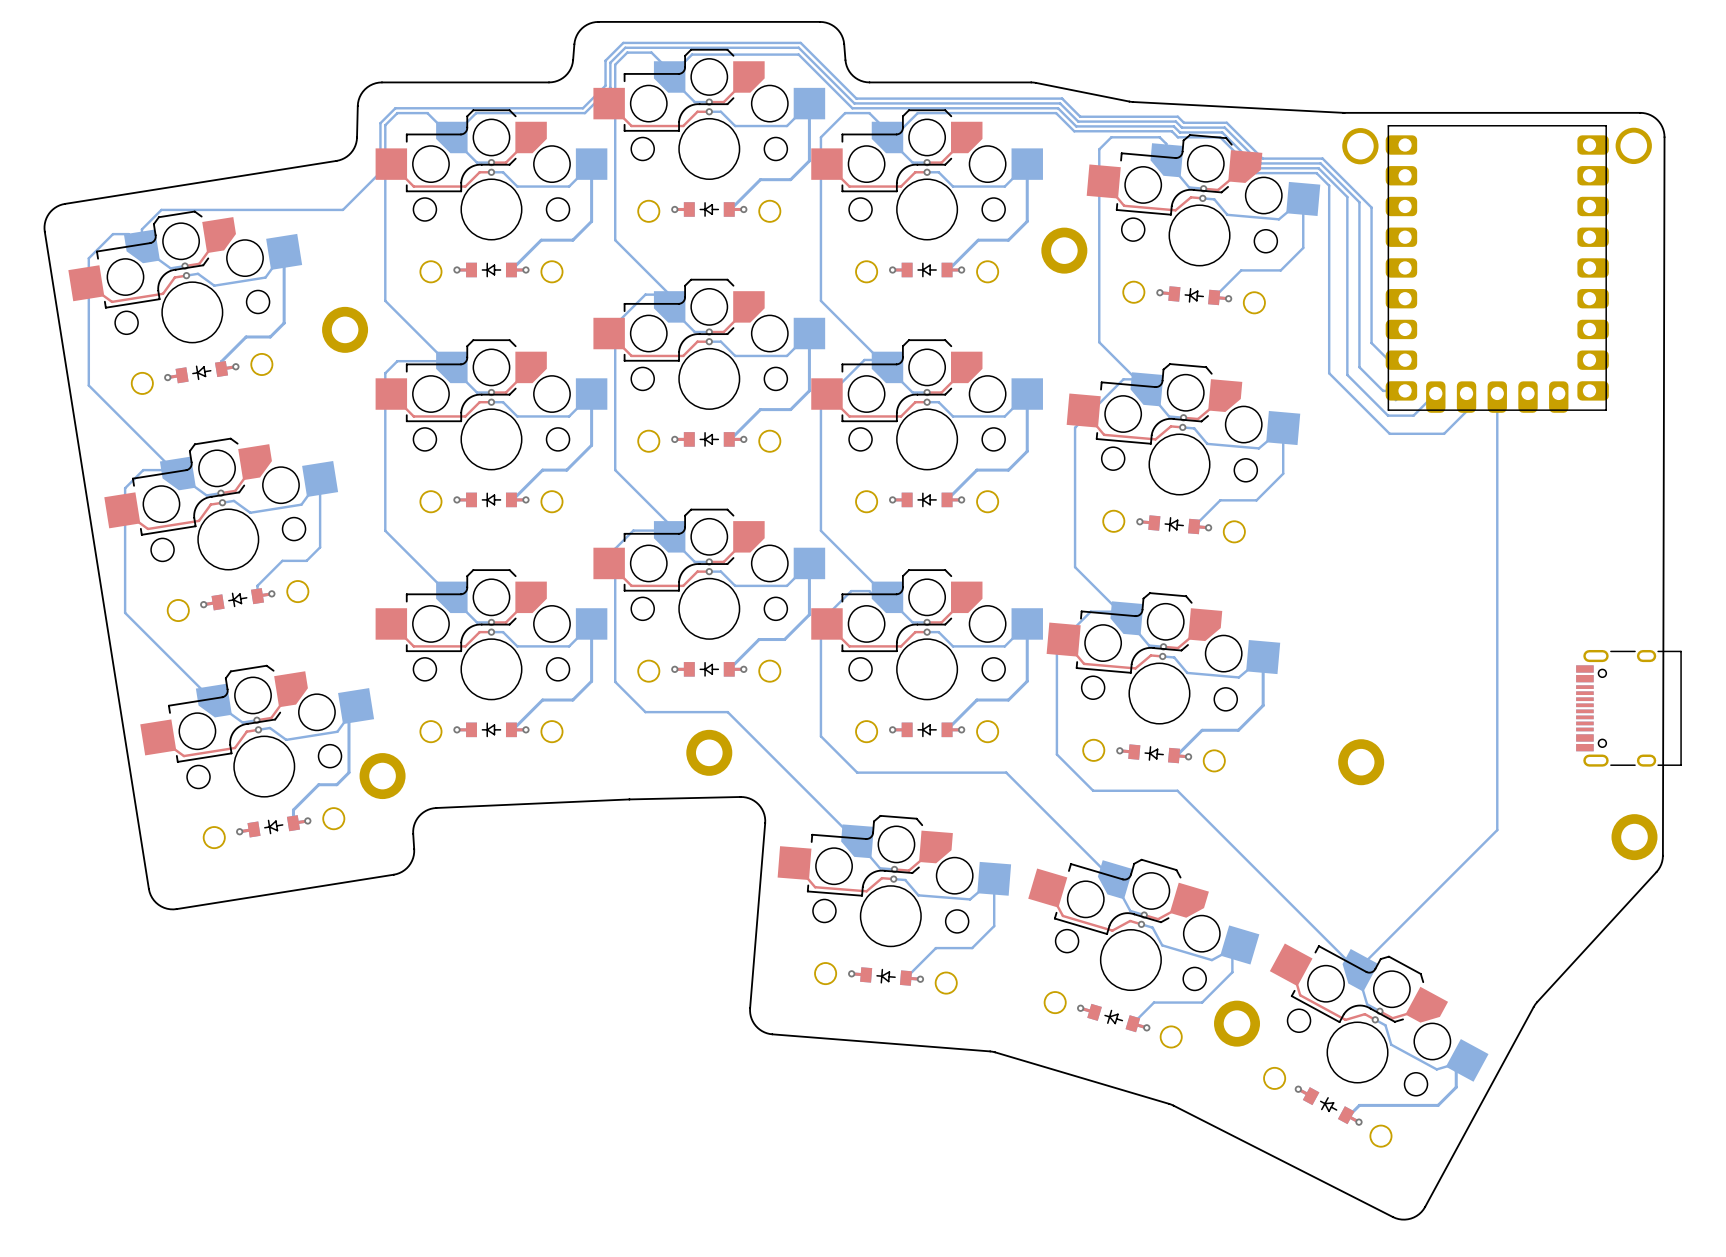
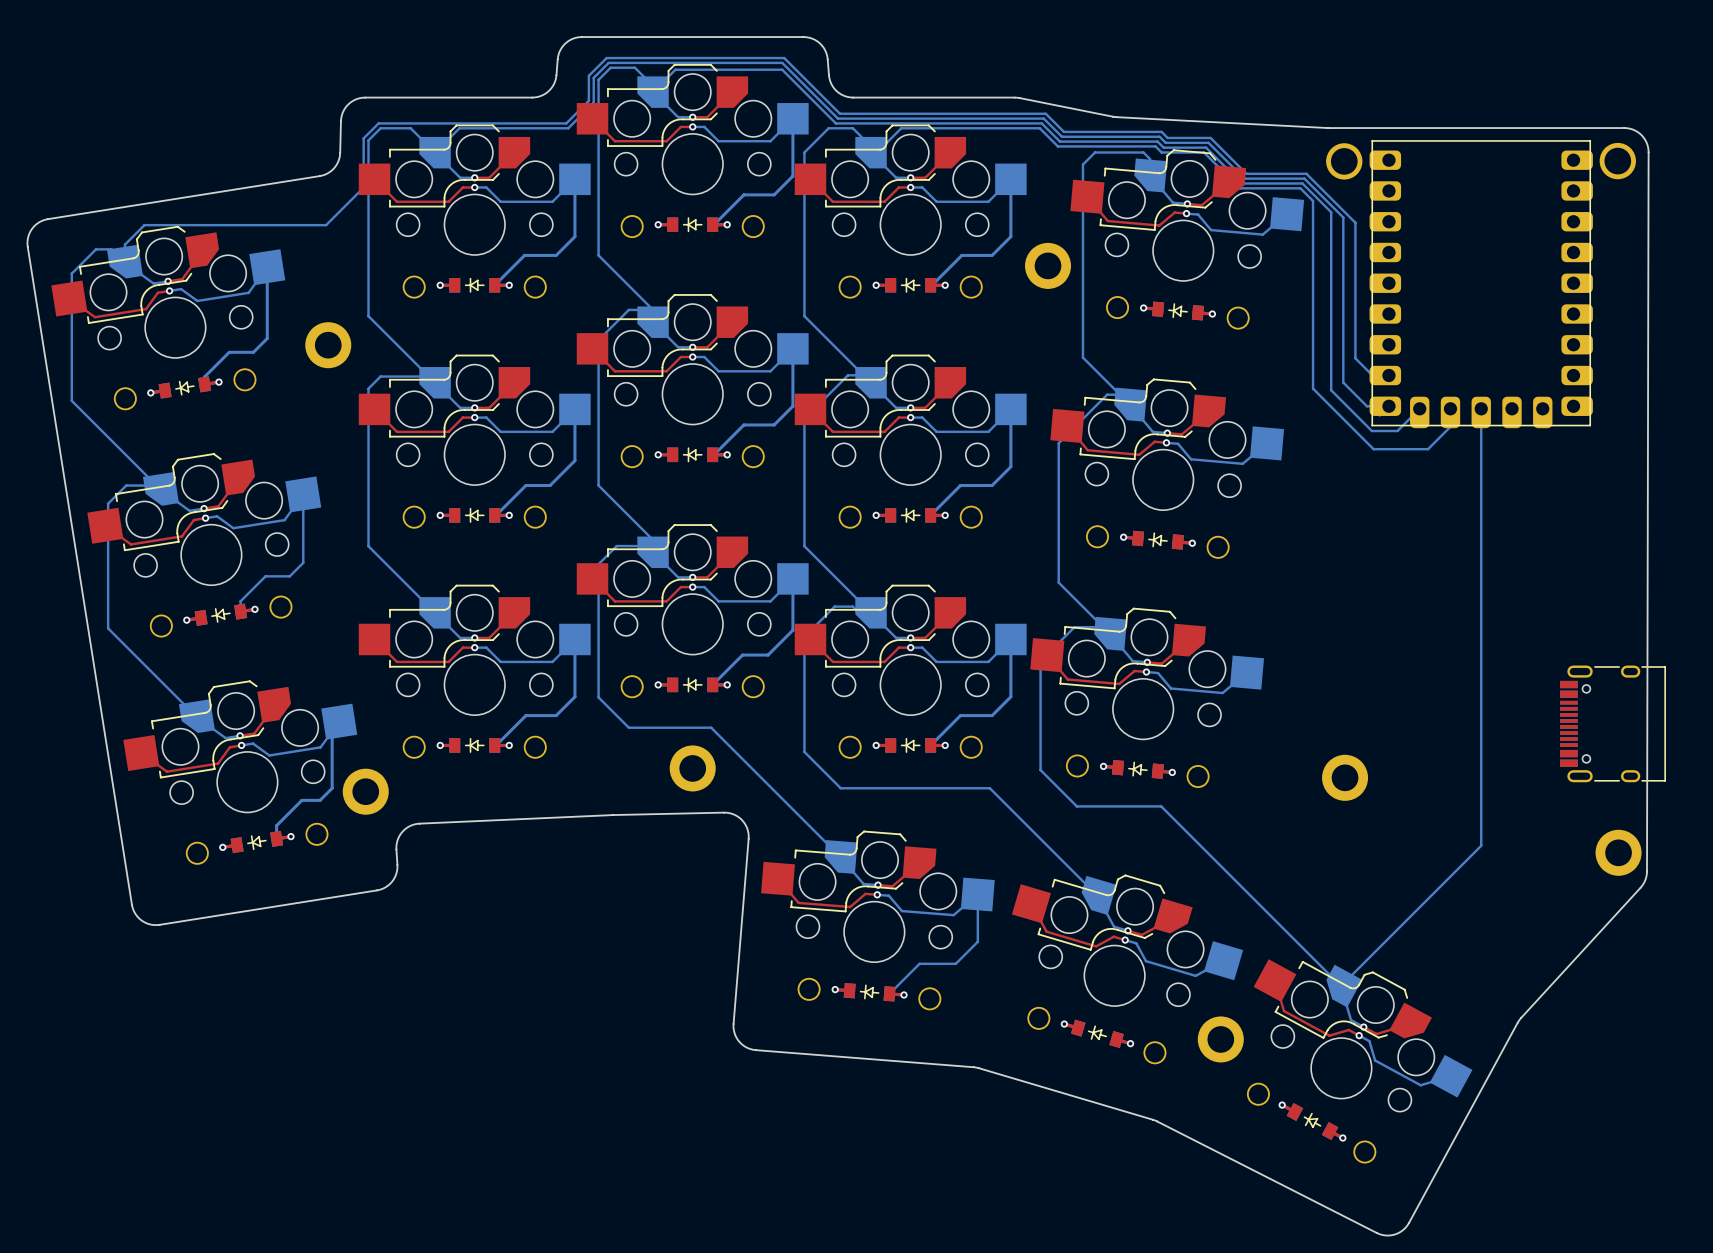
bottom track: (1303, 198) (1303, 247) (1280, 270) (1241, 270) (1214, 297) -> none
bottom track: (1283, 428) (1283, 473) (1256, 500) (1220, 500) (1194, 526) -> none
bottom track: (1263, 657) (1263, 705) (1238, 730) (1202, 730) (1176, 755) (1174, 755) -> none
bottom track: (1239, 944) (1232, 952) (1232, 972) (1202, 1002) (1154, 1002) (1132, 1023) -> none
bottom track: (1467, 1060) (1456, 1071) (1456, 1087) (1438, 1105) (1359, 1105) (1349, 1115) (1346, 1115) -> none

